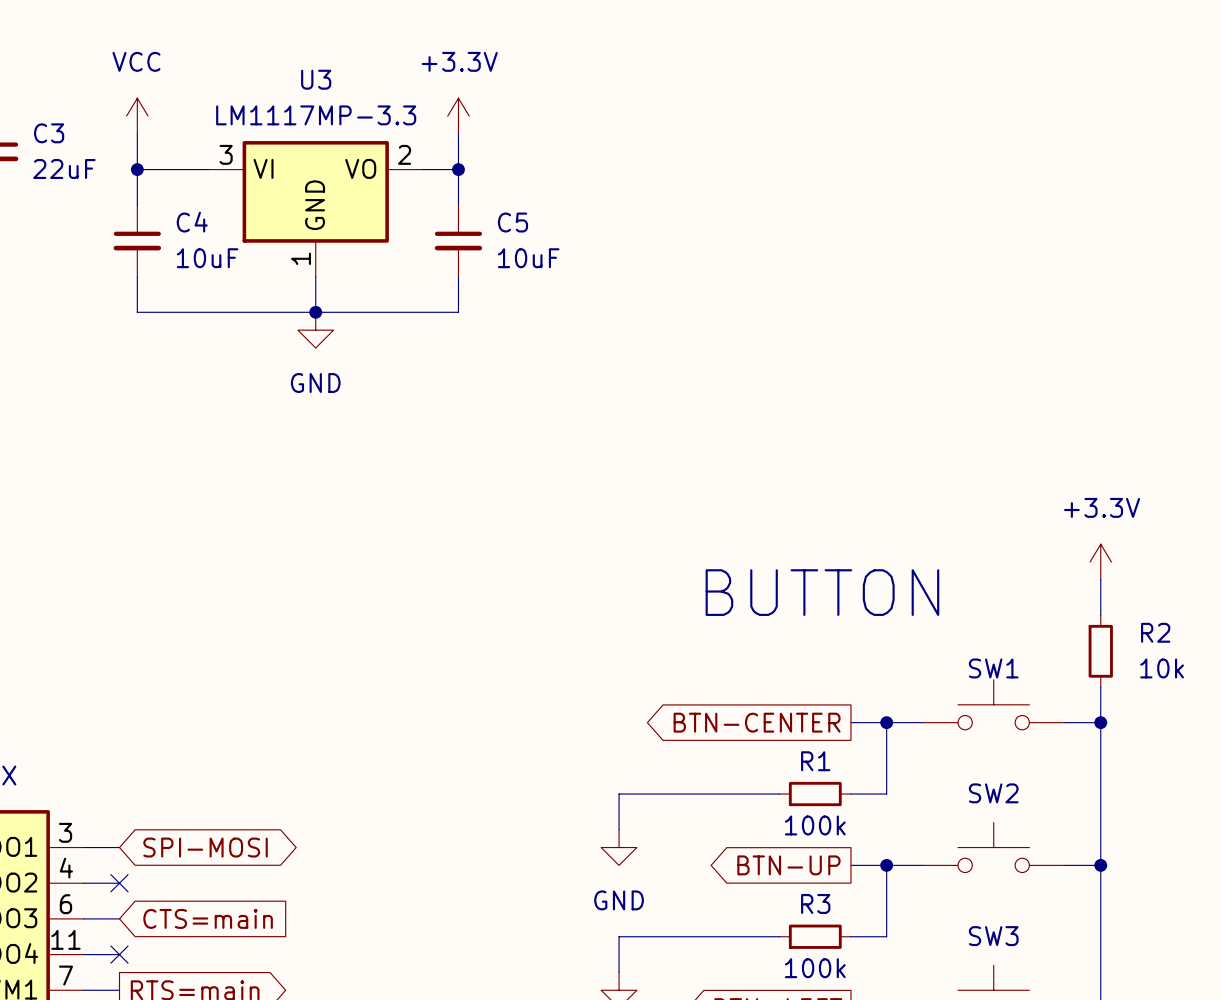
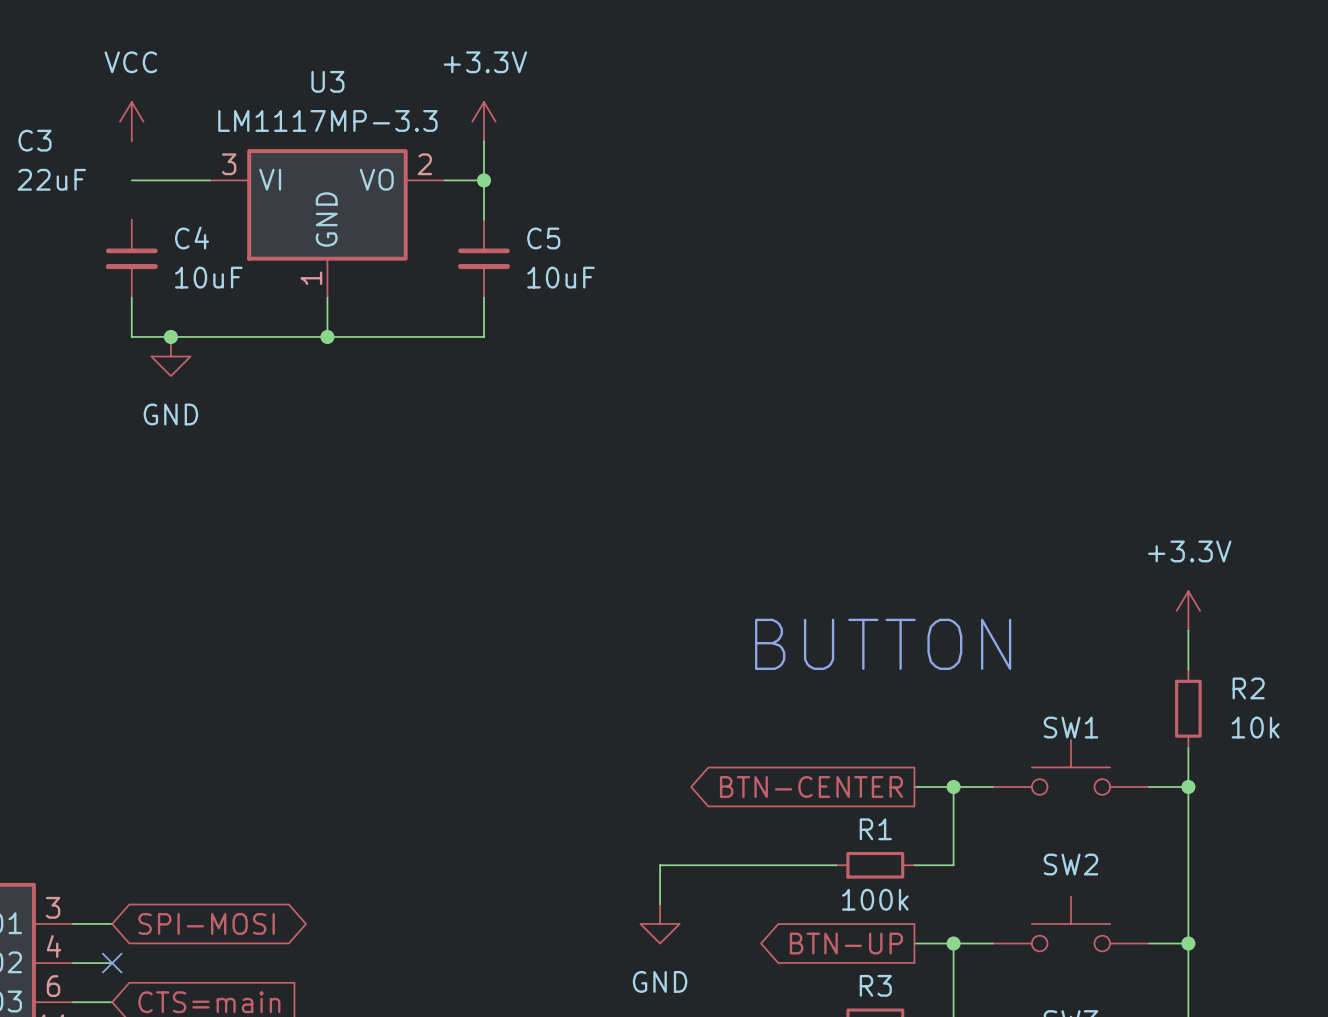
wire: (137, 133) (137, 205) -> none
junction: (137, 169) -> none
junction: none -> (170, 336)
power symbol position: GND (315, 330) -> GND (170, 356)

